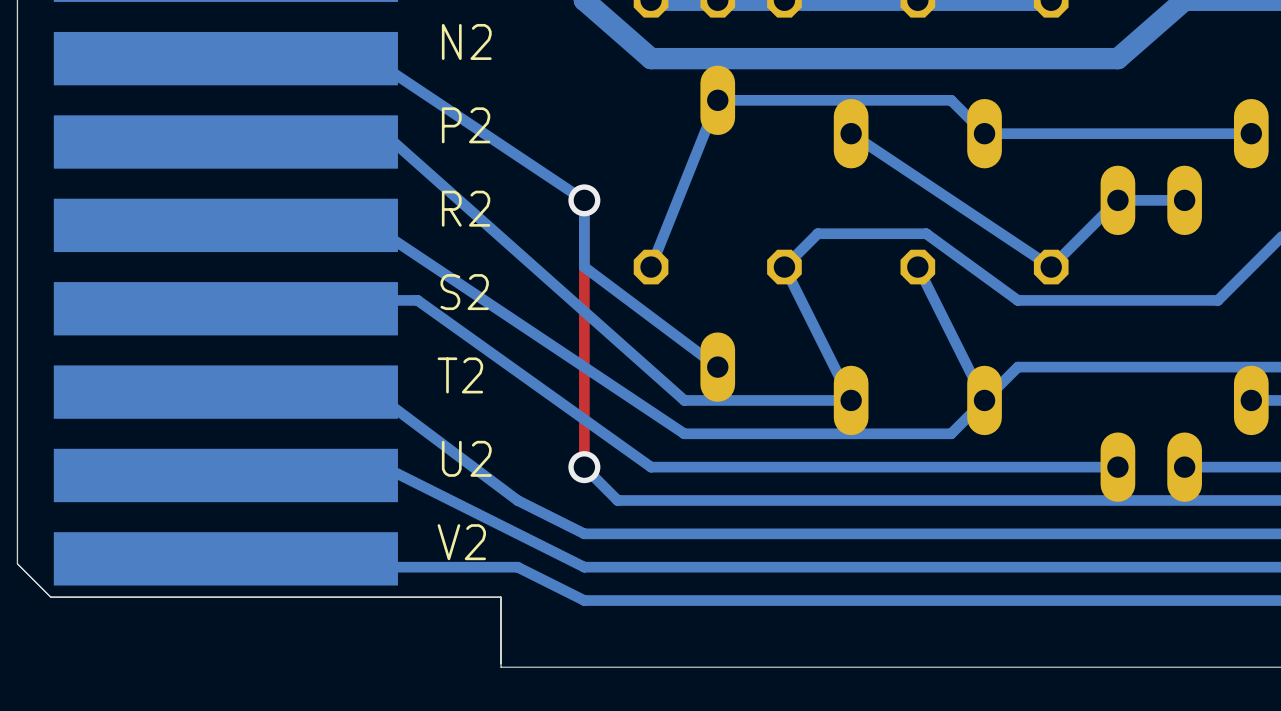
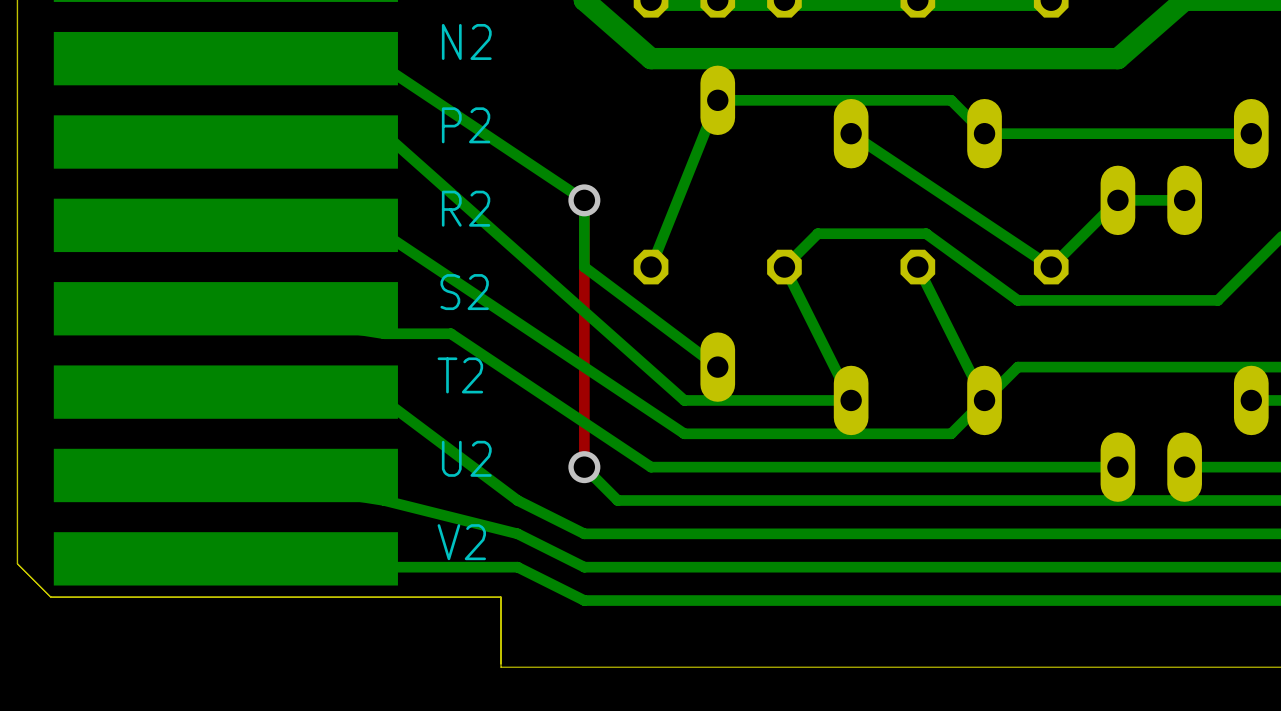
bottom track: (225, 308) (350, 300) (417, 300) (651, 467) -> (225, 308) (384, 333) (450, 333) (651, 467)
bottom track: (225, 475) (384, 467) (517, 533) -> (225, 475) (384, 500) (517, 533)

